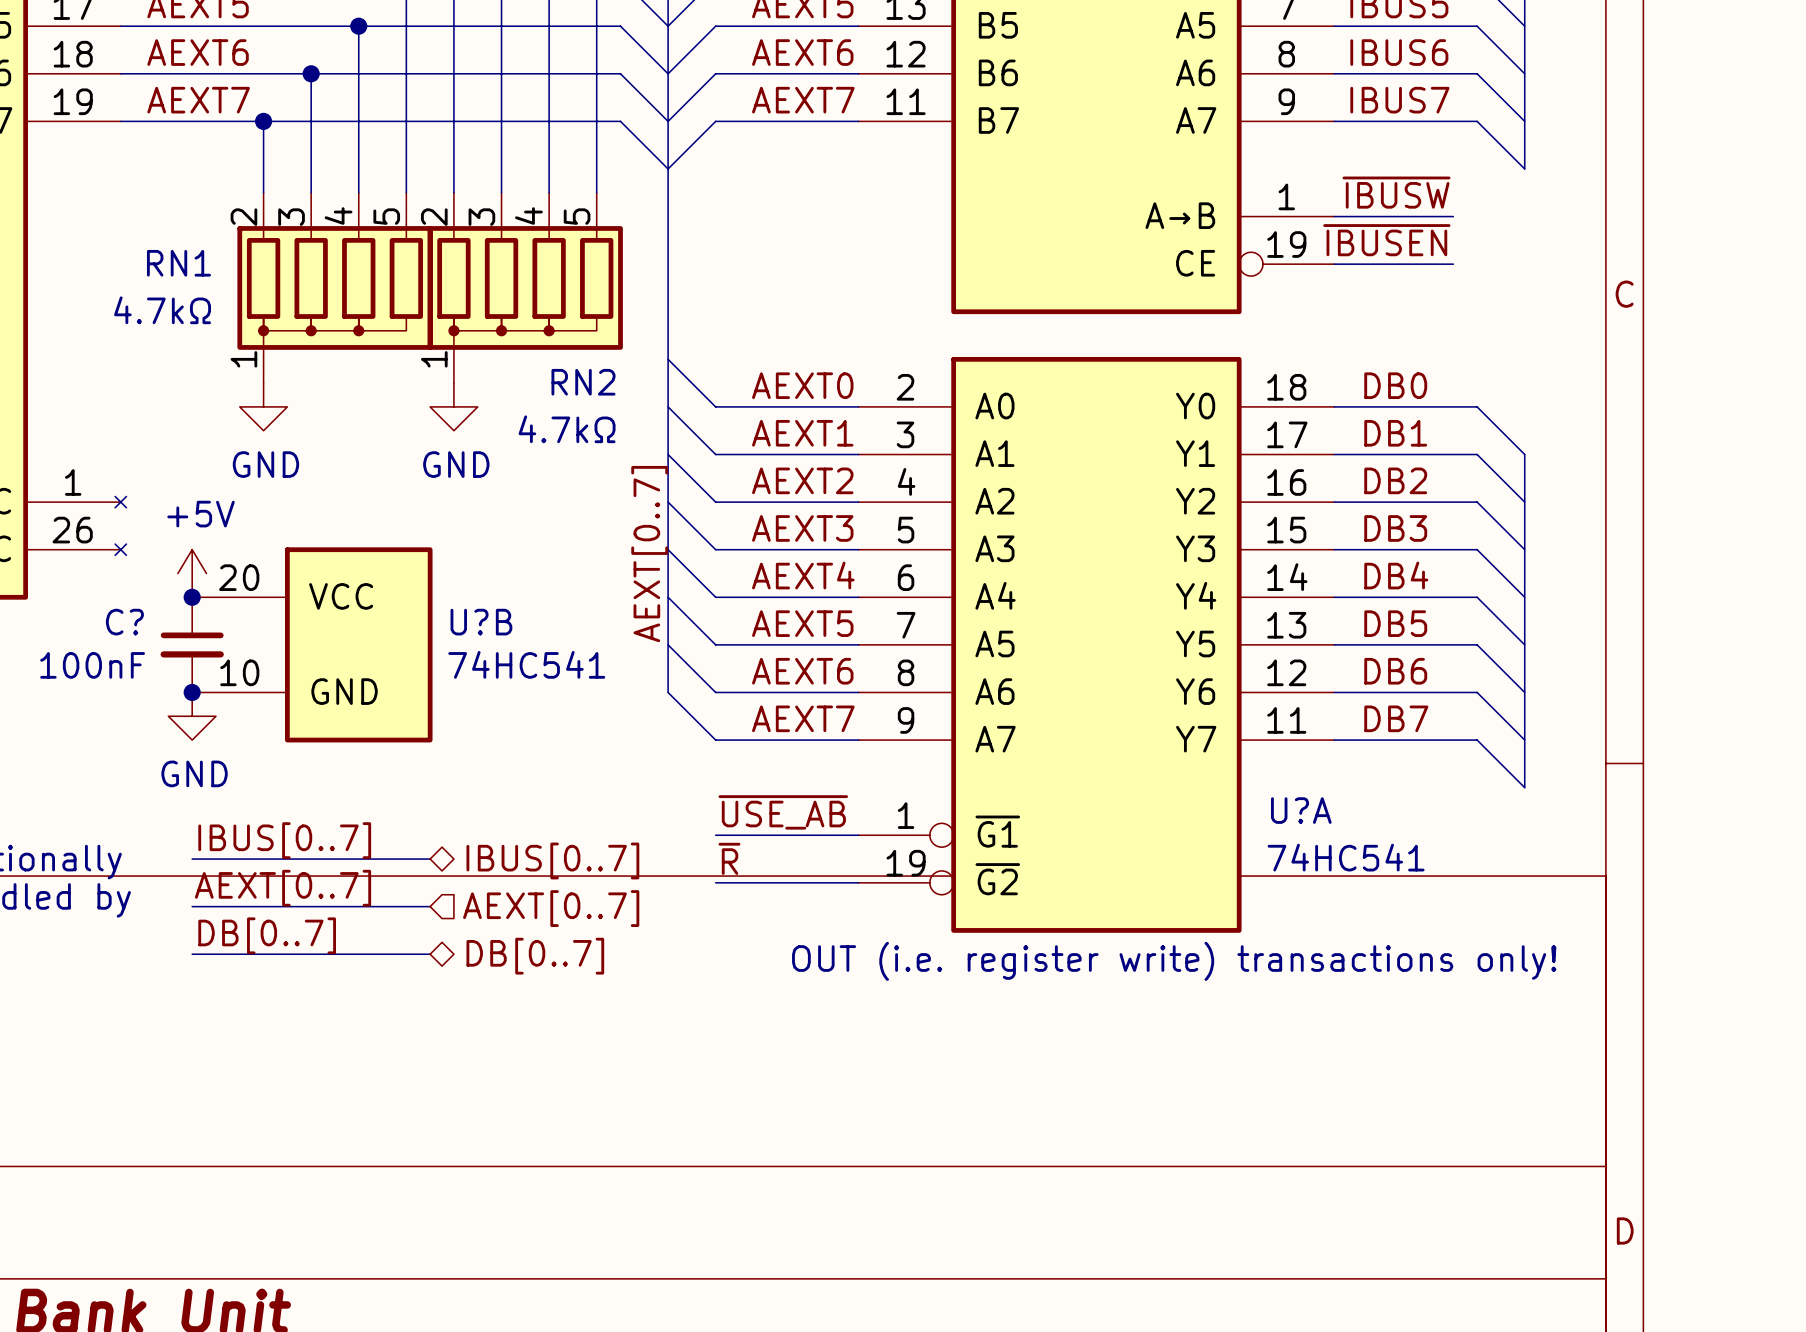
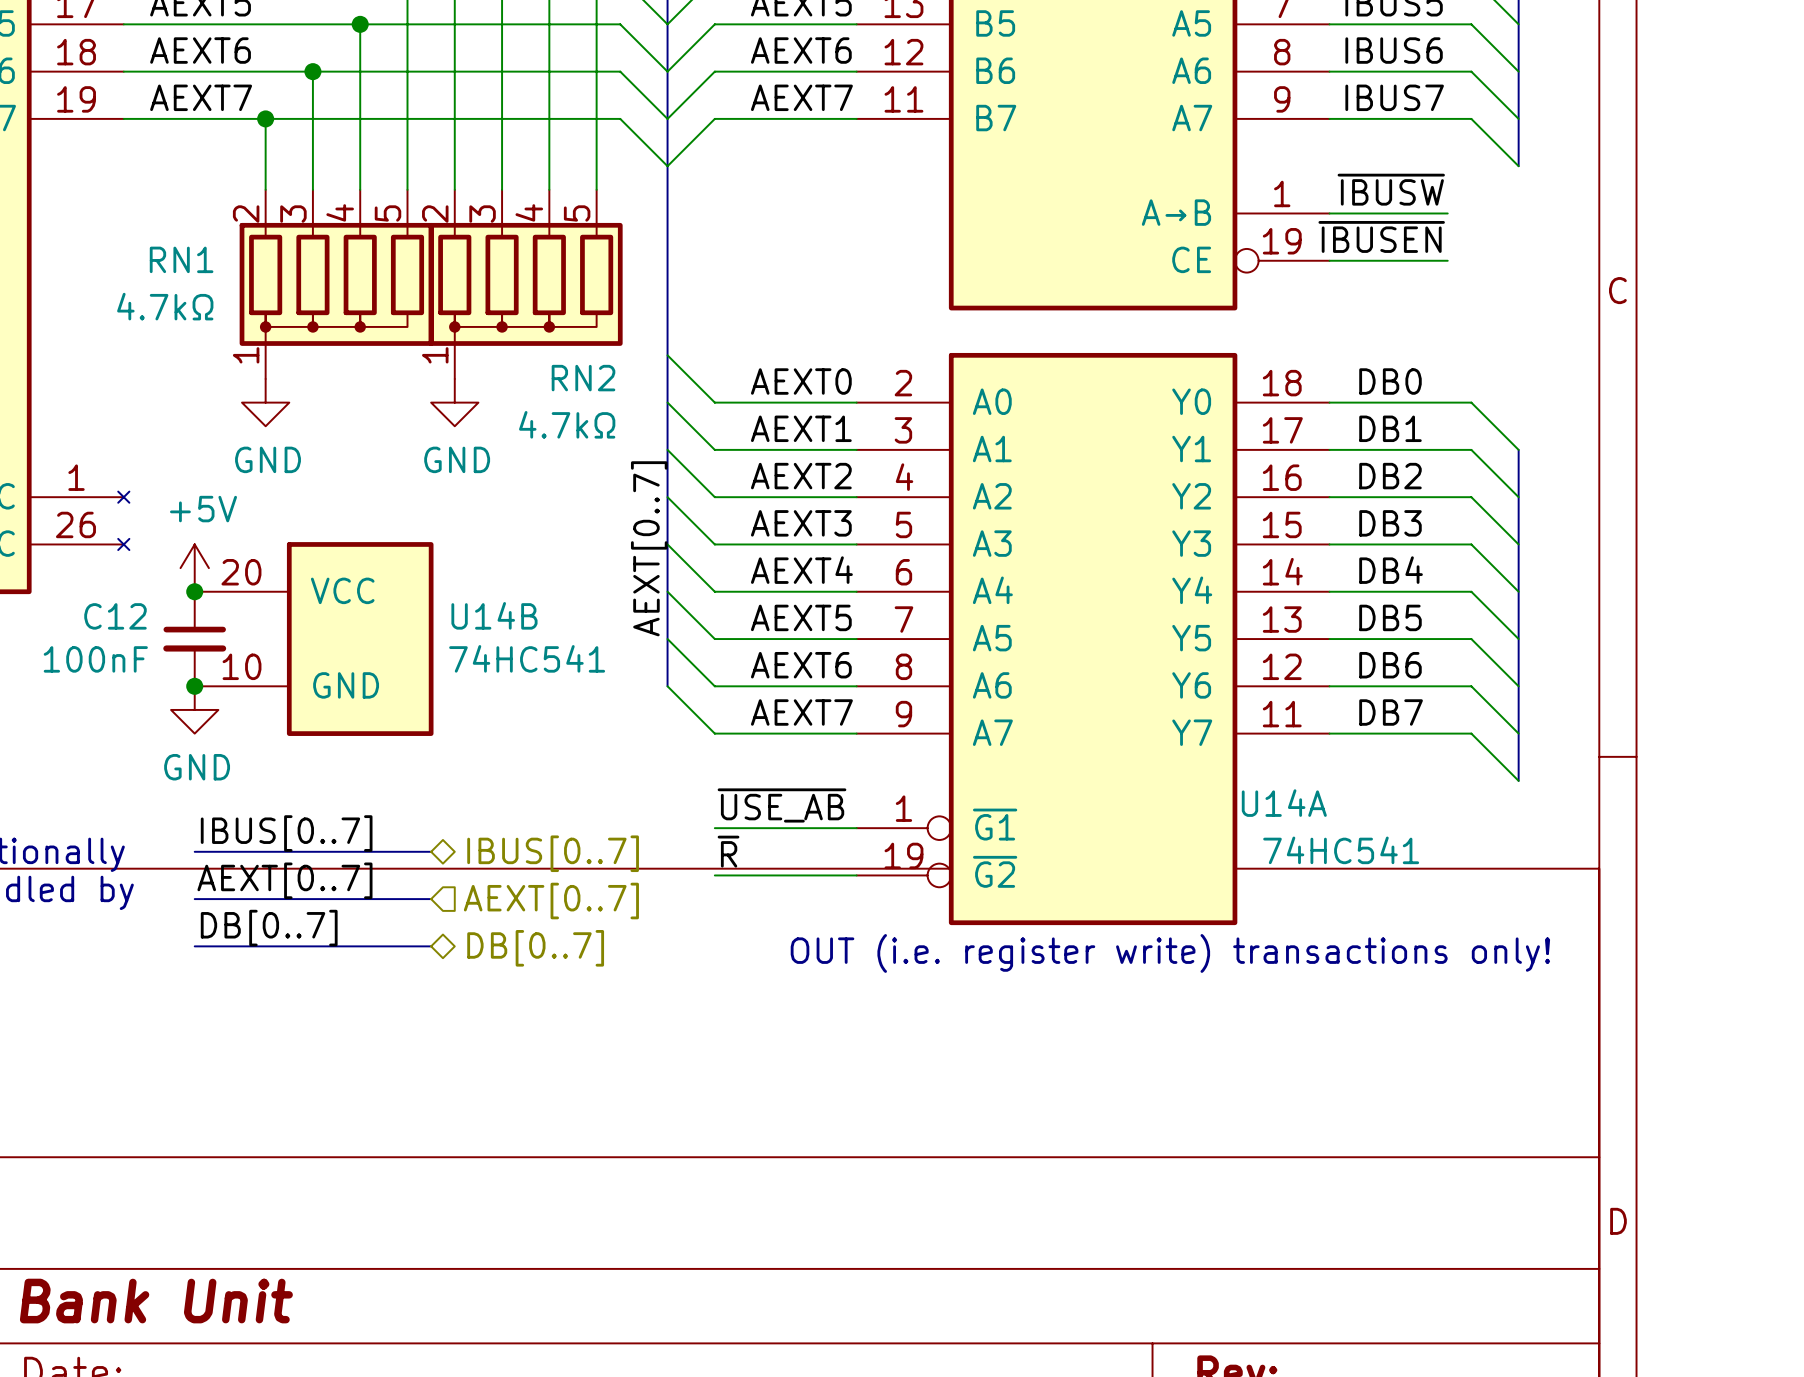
C? name: C? (124, 622) -> C12 (115, 616)
U?B name: U?B (481, 622) -> U14B (494, 615)
U?A name: U?A (1301, 810) -> U14A (1284, 803)

